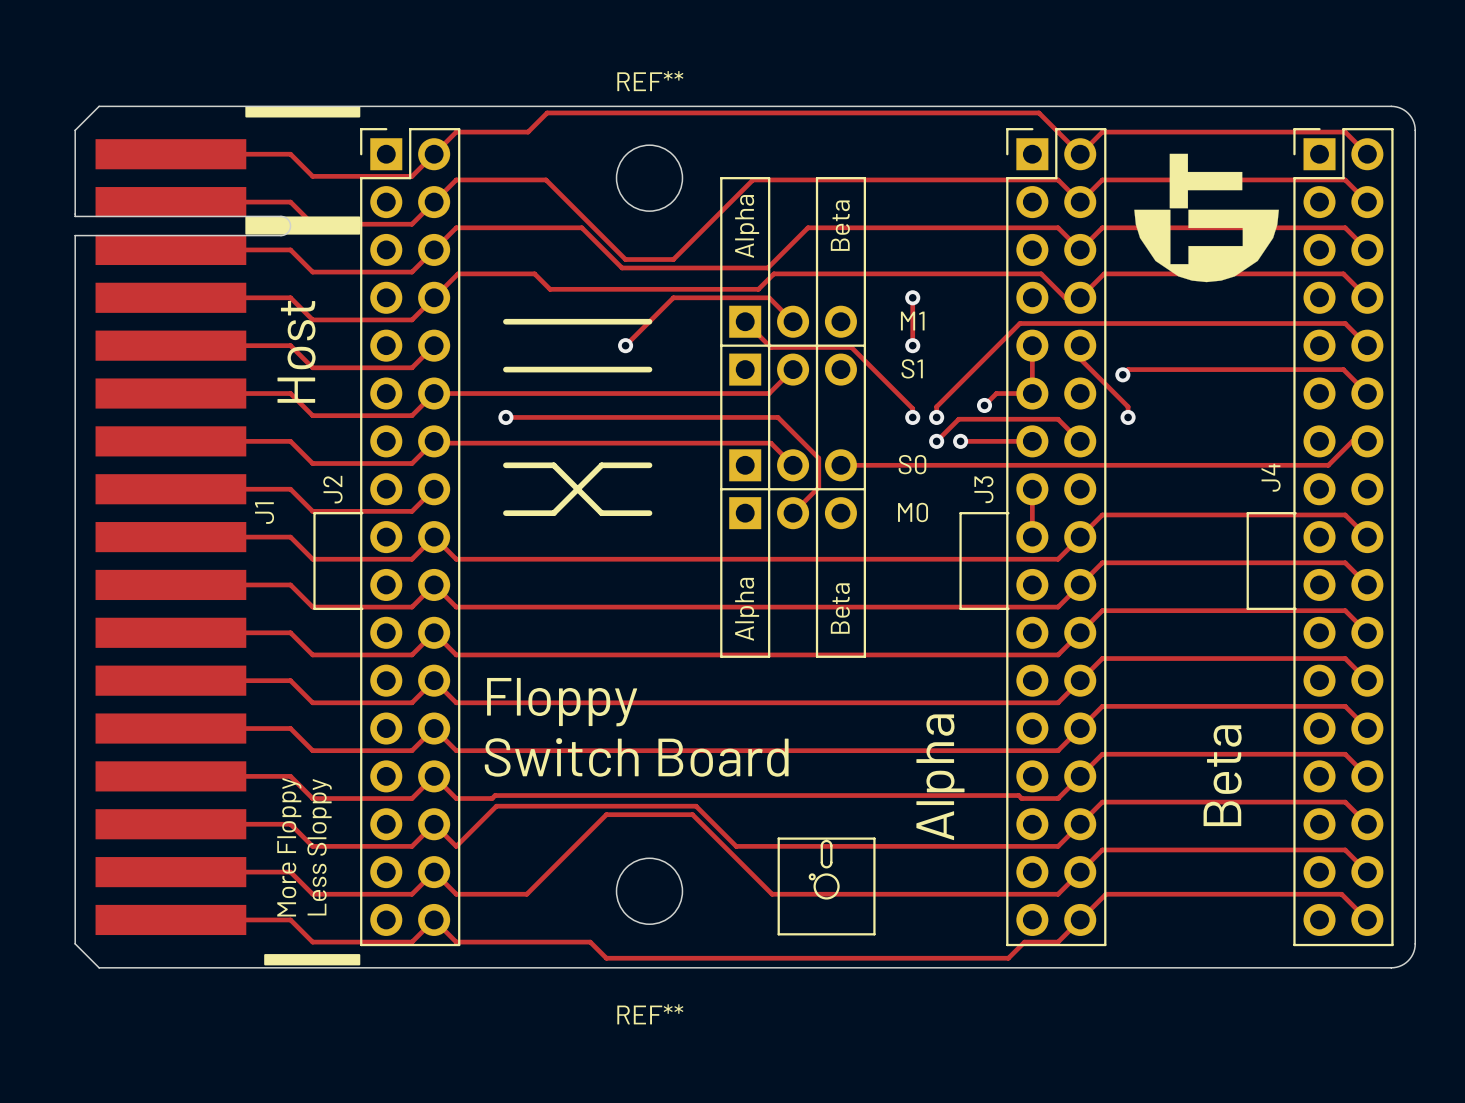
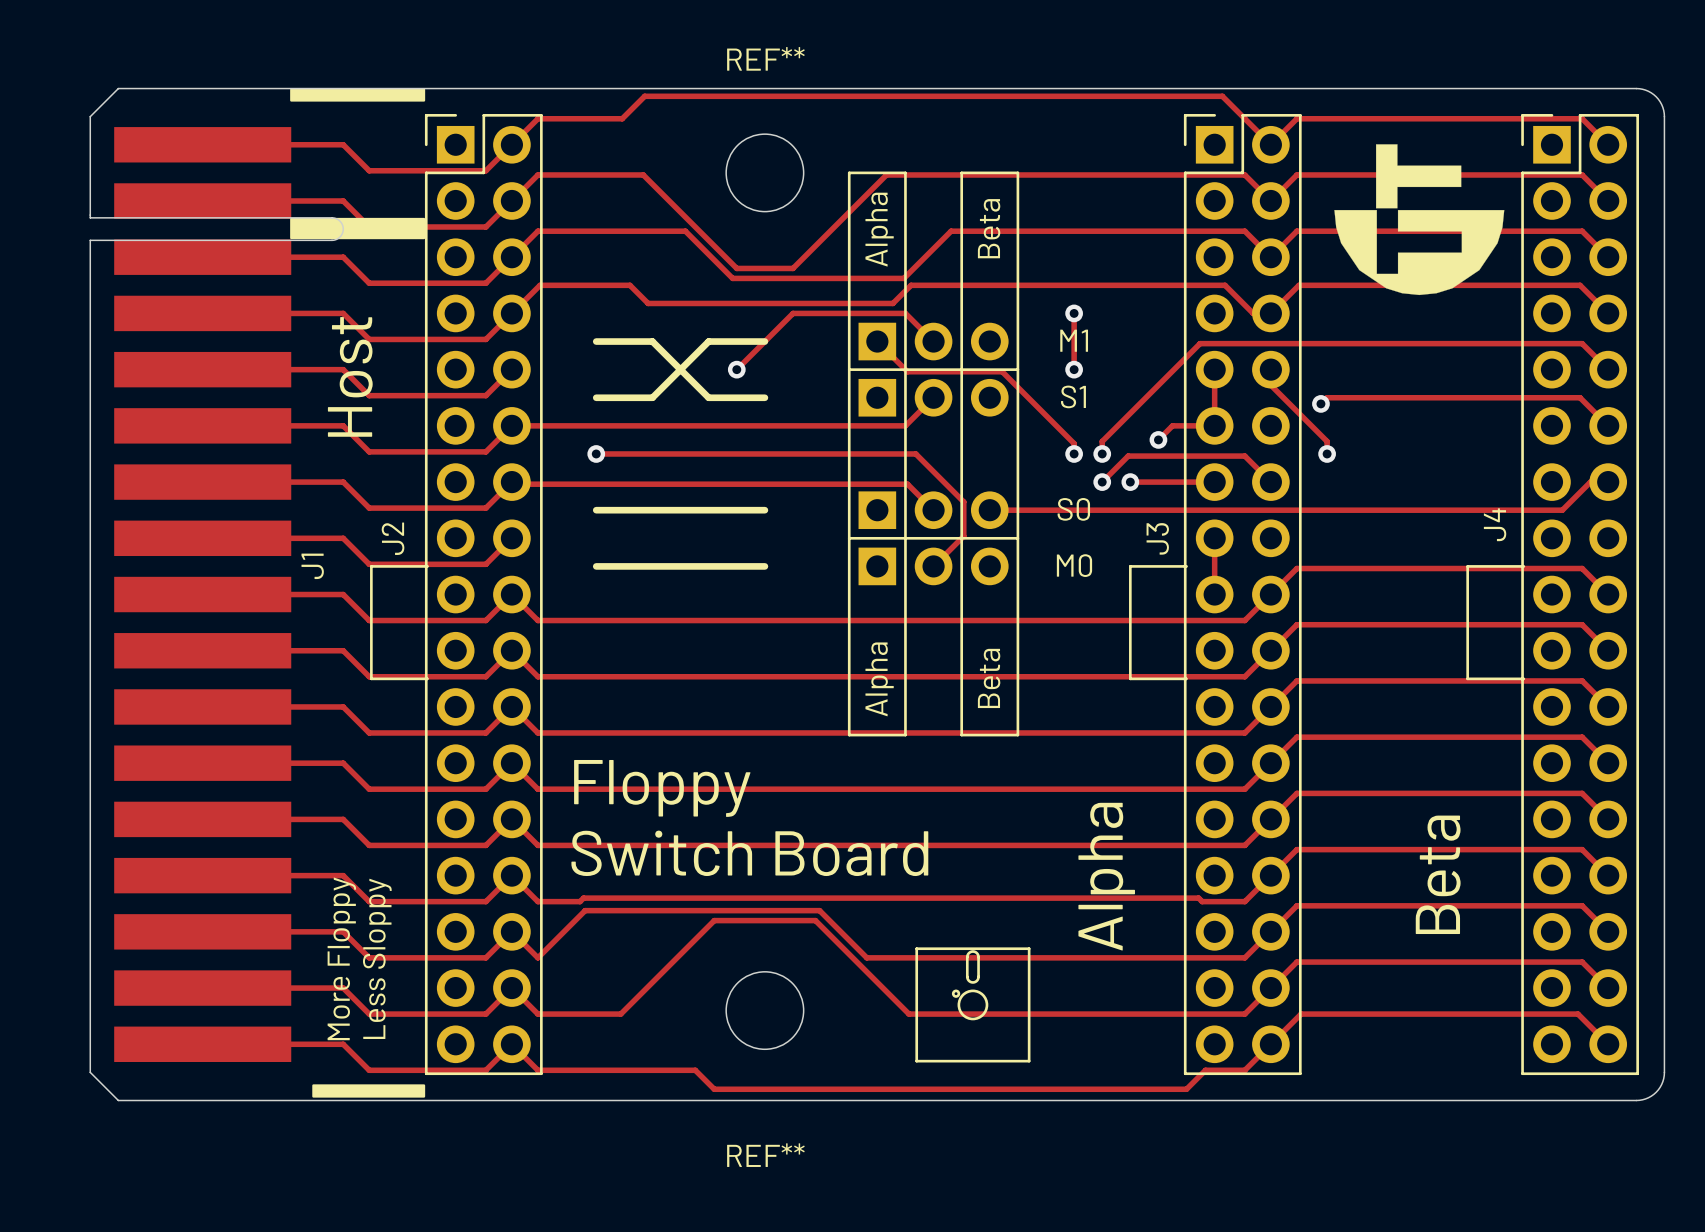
line: (553, 321) (601, 321) -> (652, 341) (708, 397)
line: (553, 369) (601, 369) -> (652, 397) (708, 341)
line: (553, 465) (601, 513) -> (652, 510) (708, 510)
line: (601, 465) (553, 513) -> (708, 566) (652, 566)

